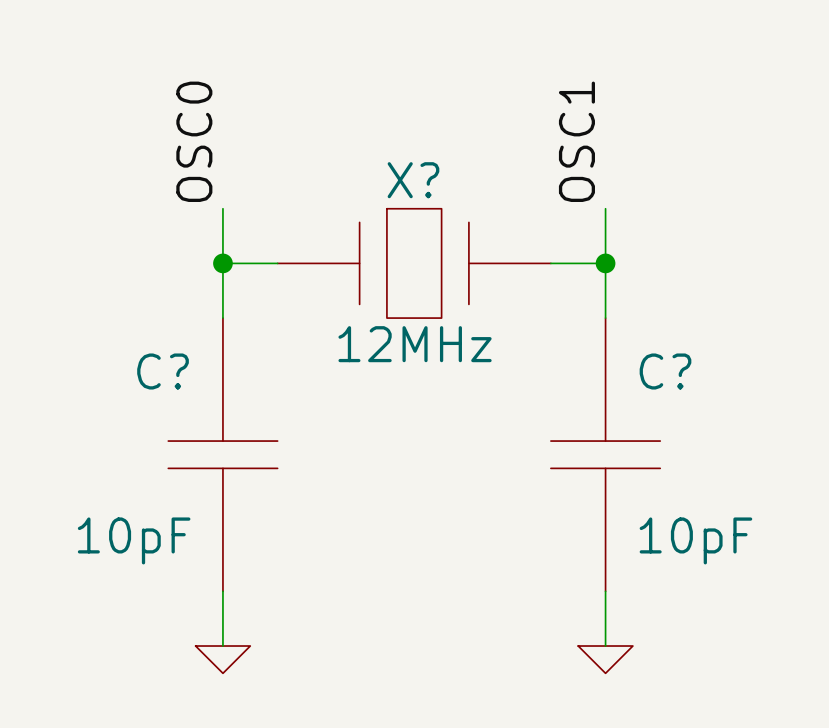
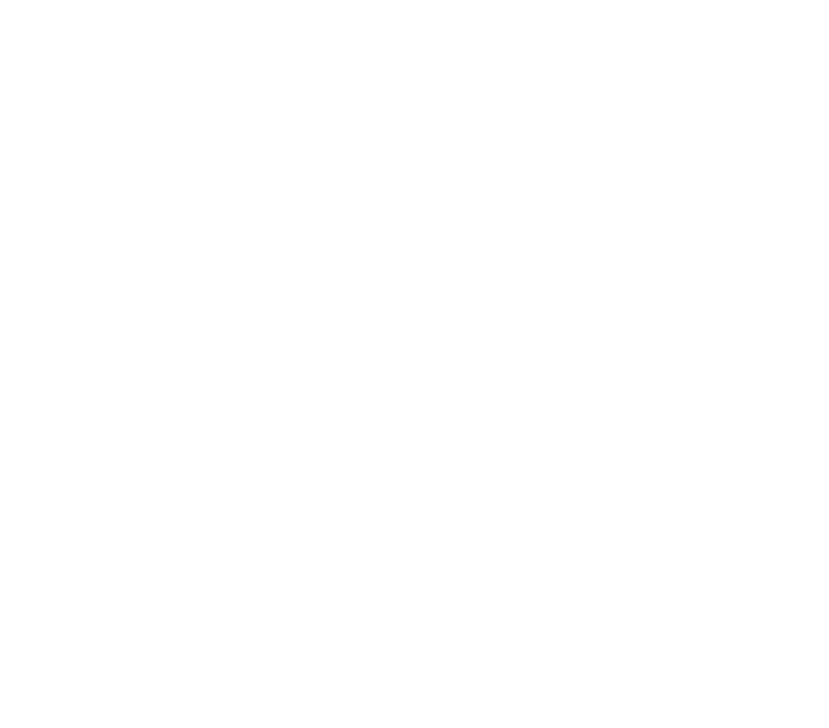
label: OSC0 (194, 141) -> none
label: OSC1 (576, 141) -> none
wire: (222, 208) (222, 318) -> none
wire: (605, 208) (605, 318) -> none
wire: (222, 263) (277, 263) -> none
junction: (222, 263) -> none
X?: 12MHz (414, 263) -> none
wire: (550, 263) (605, 263) -> none
junction: (605, 263) -> none
C?: 10pF (222, 454) -> none
C?: 10pF (605, 454) -> none
wire: (222, 591) (222, 646) -> none
wire: (605, 591) (605, 646) -> none
power symbol: (222, 659) -> none
power symbol: (605, 659) -> none

